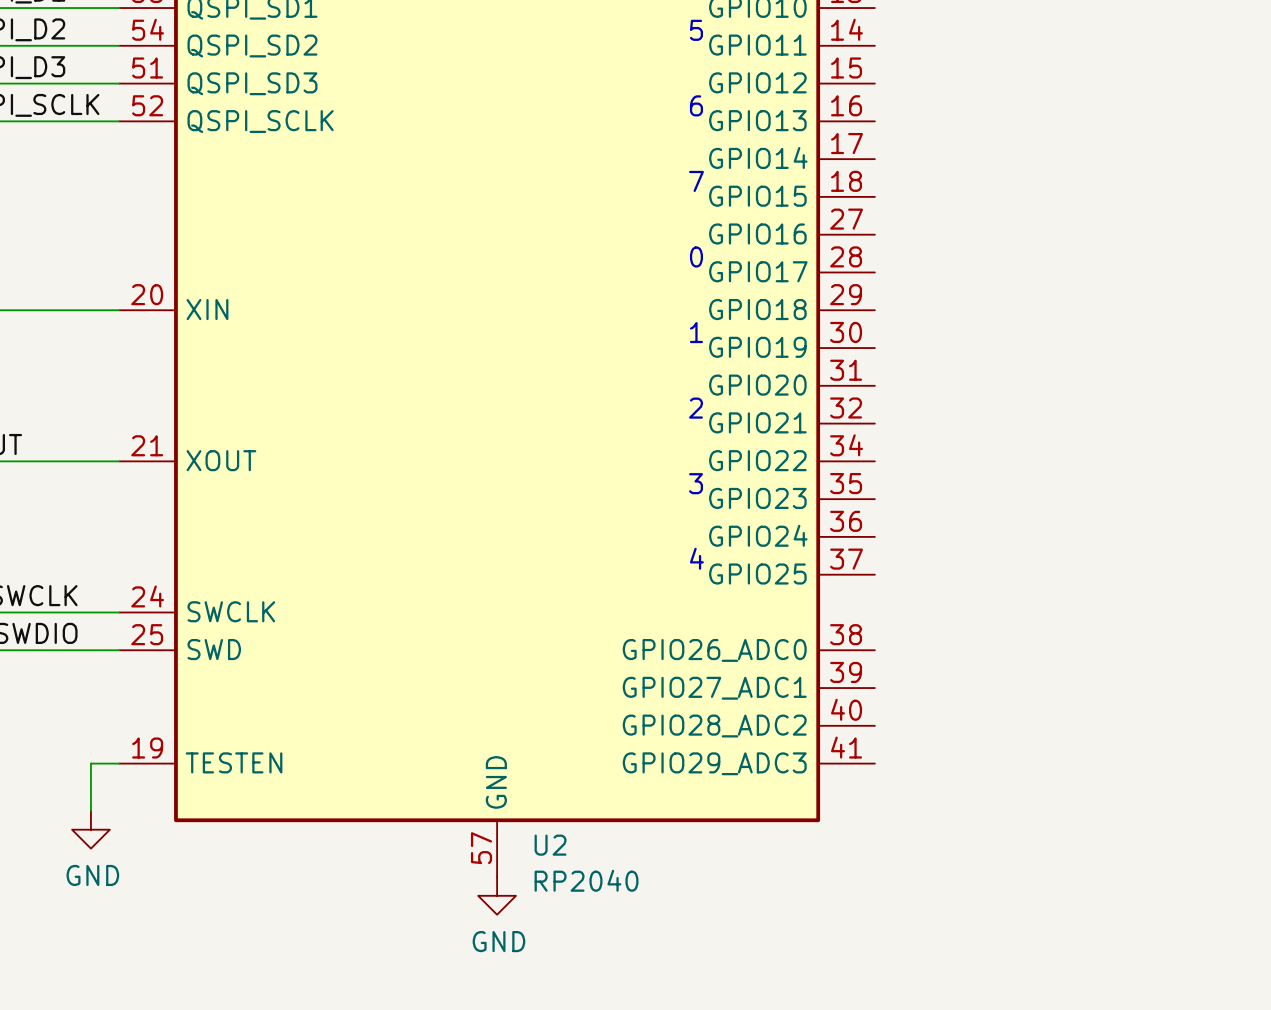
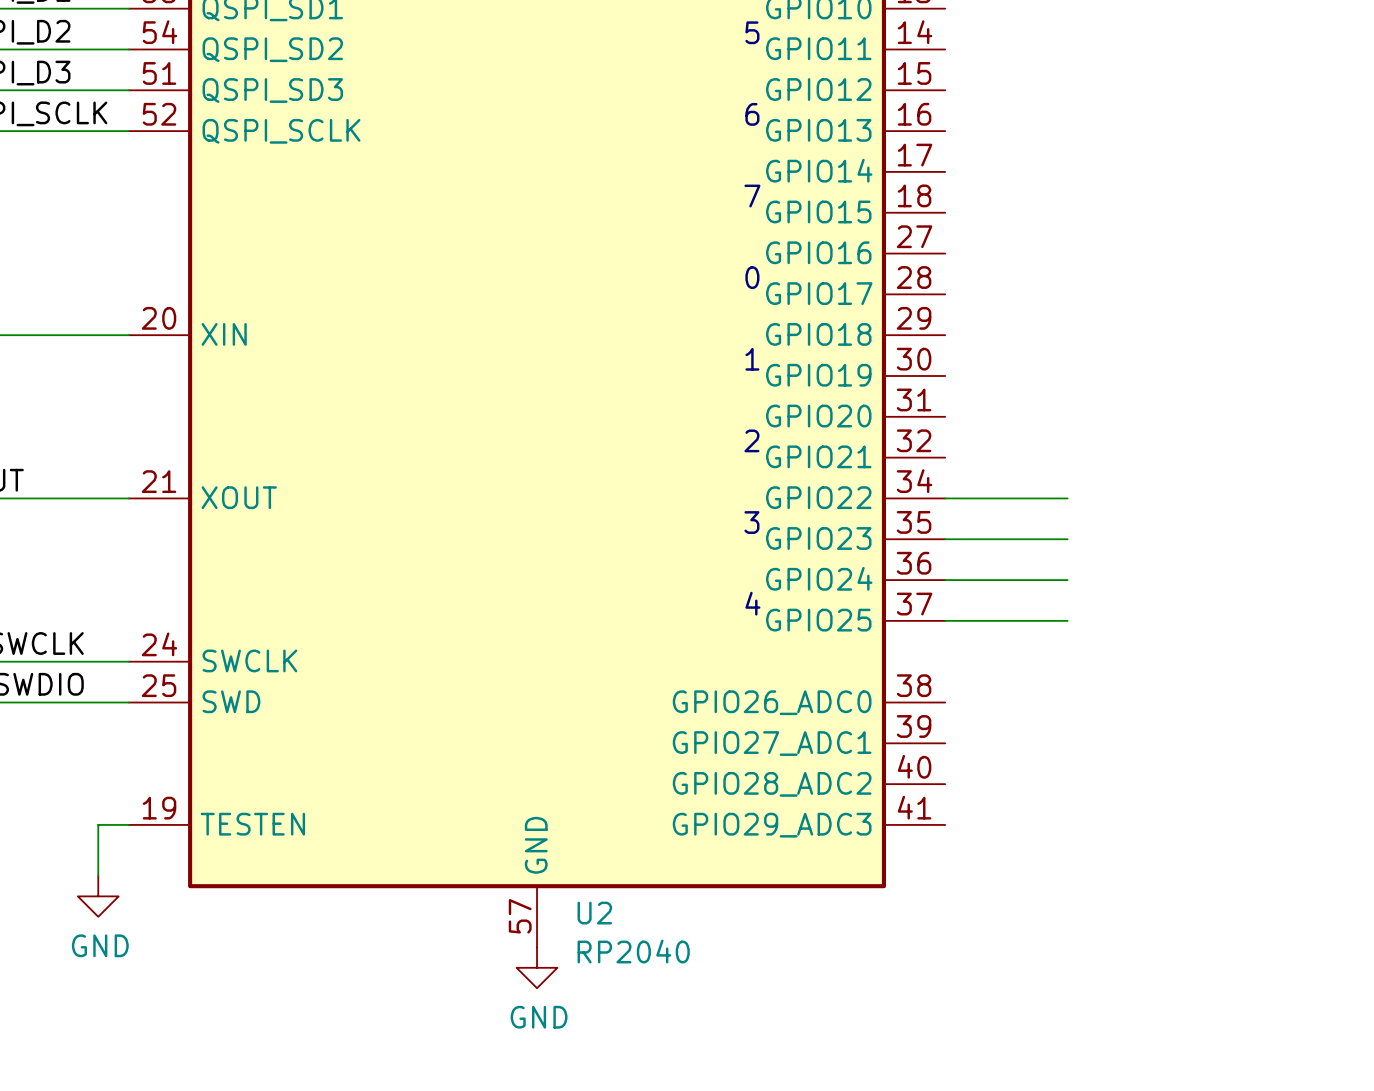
wire: none -> (945, 498) (1067, 498)
wire: none -> (945, 539) (1067, 539)
wire: none -> (945, 580) (1067, 580)
wire: none -> (945, 620) (1067, 620)

